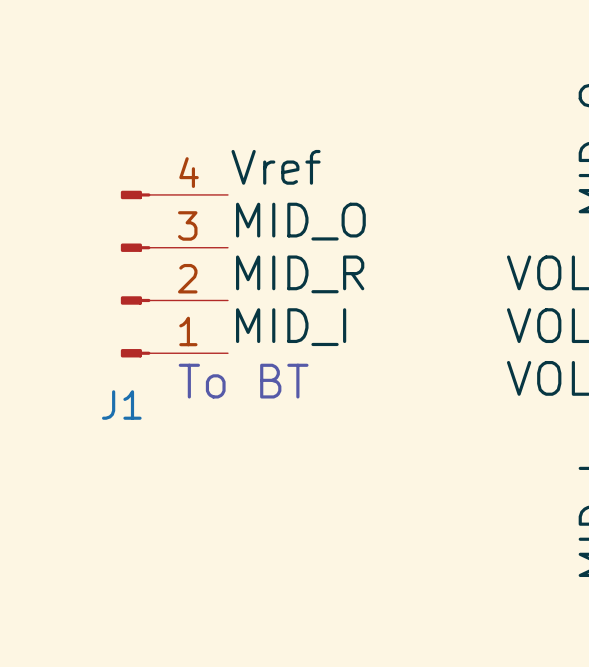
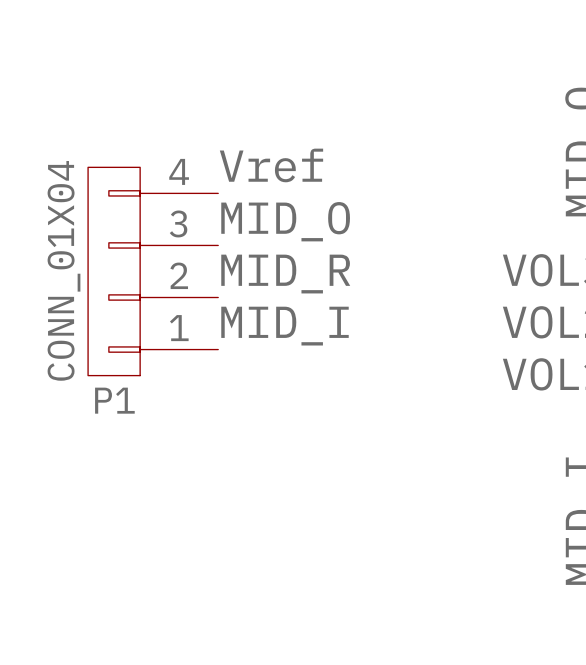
P1: none -> CONN_01X04 (153, 271)
J1: (174, 274) -> none
text: To BT (243, 381) -> none

